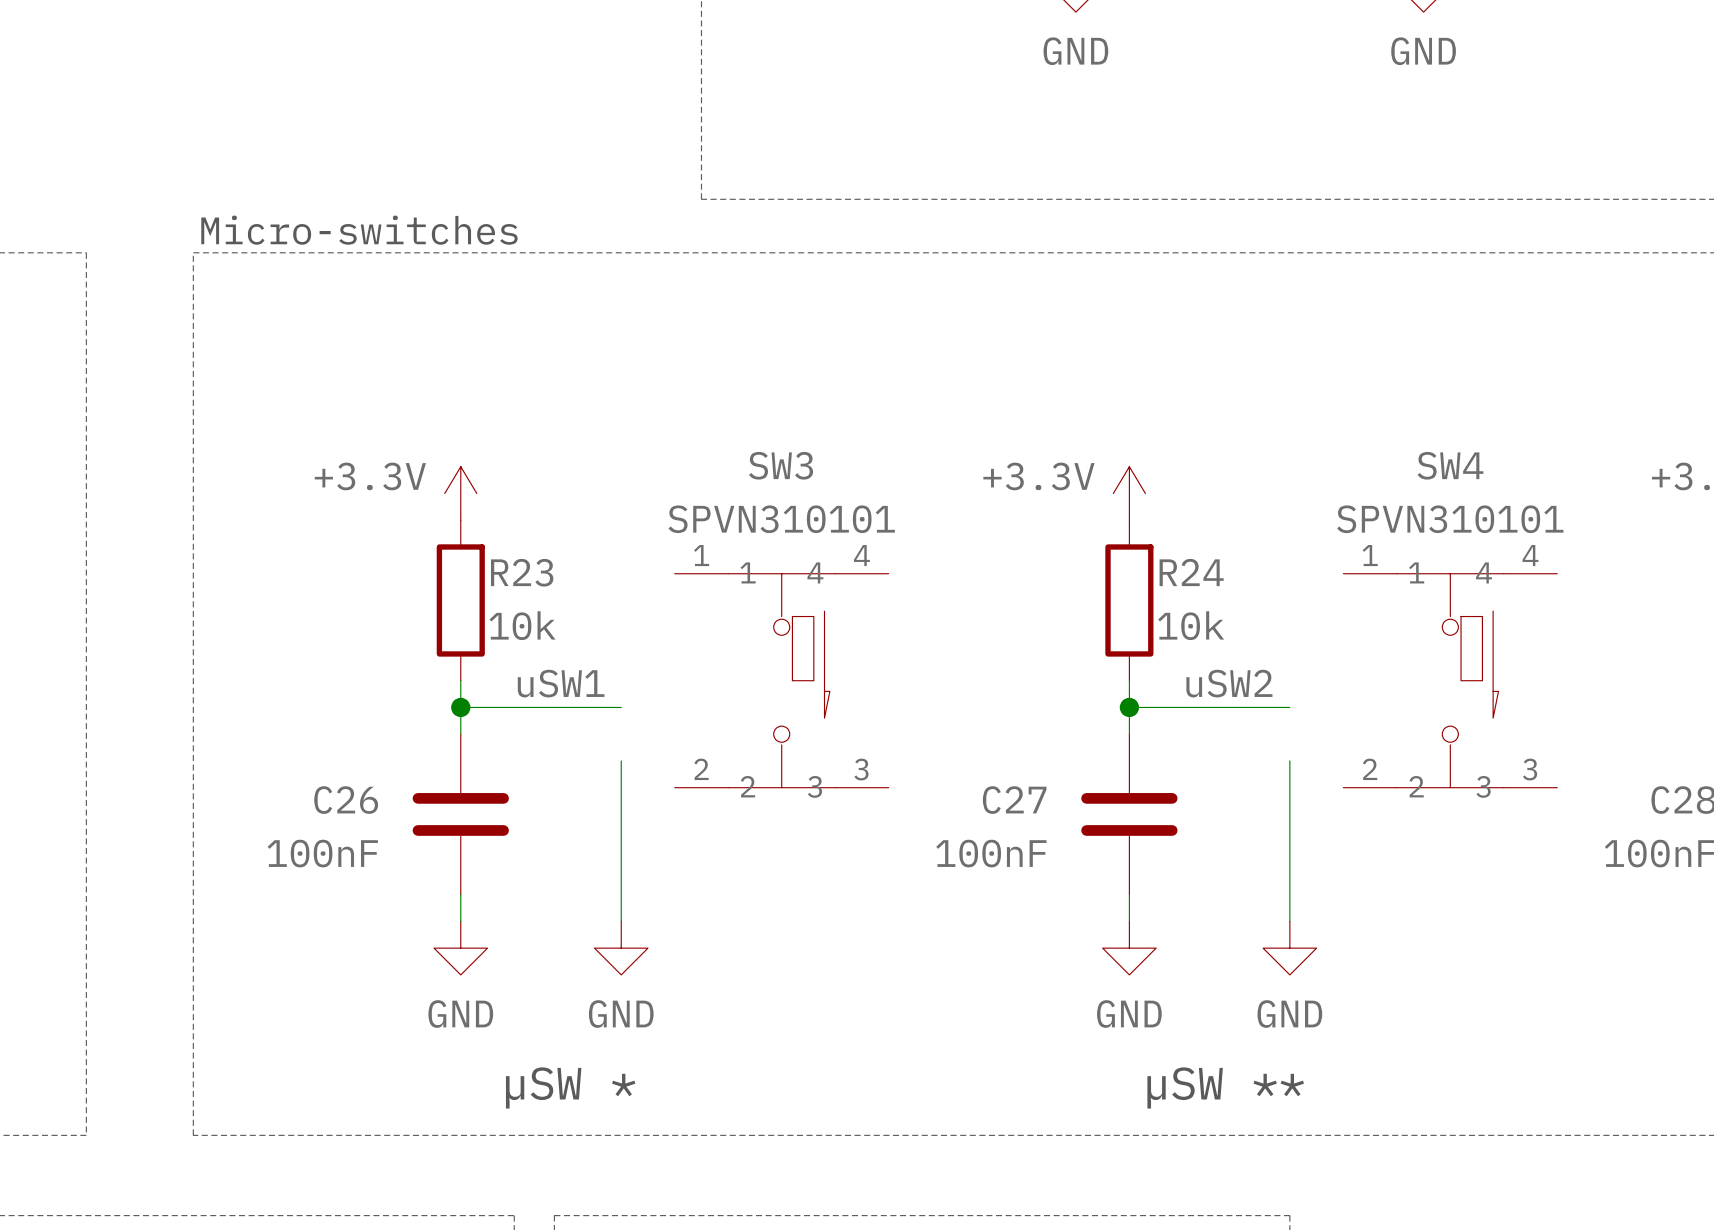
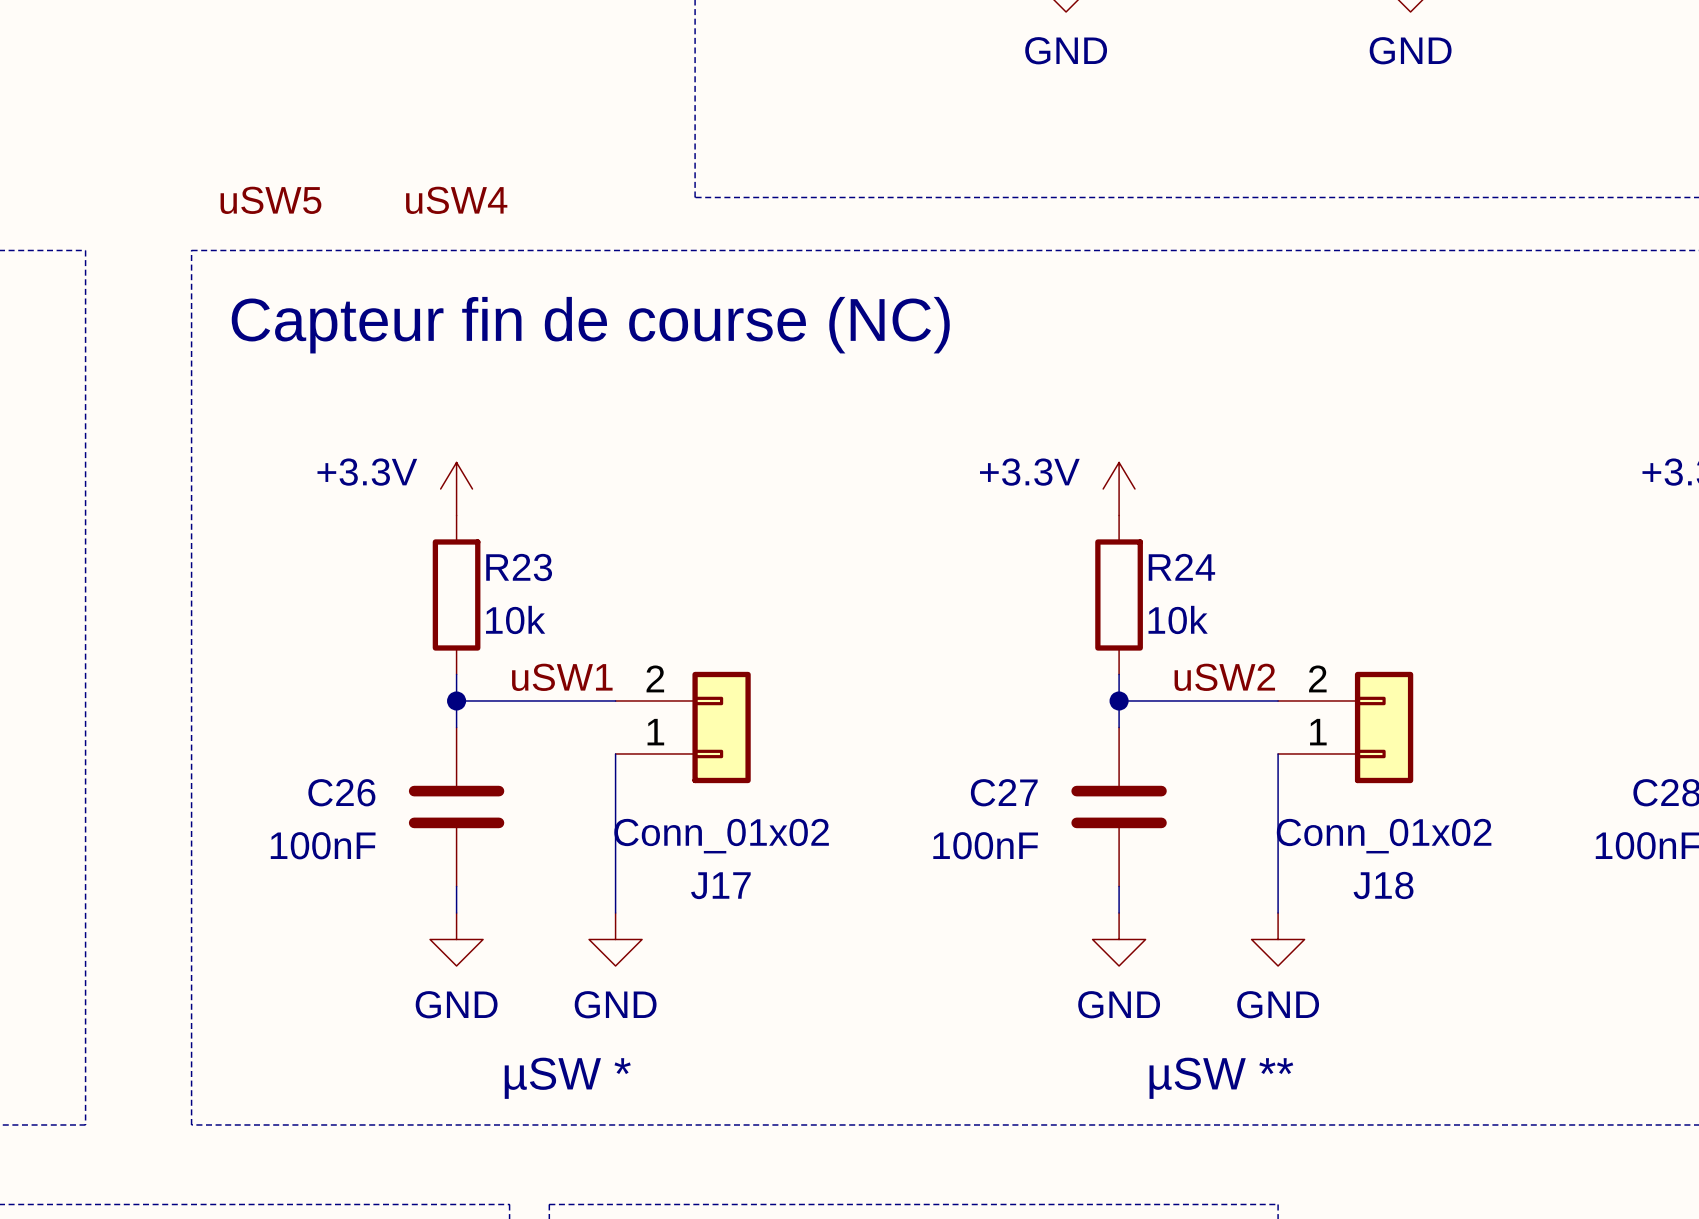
label: none -> uSW5 (270, 200)
label: none -> uSW4 (456, 200)
text: Micro-switches (359, 230) -> none
text: none -> Capteur fin de course (NC) (590, 325)
SW3: SPVN310101 (781, 680) -> none
SW4: SPVN310101 (1450, 680) -> none
J17: none -> Conn_01x02 (683, 727)
J18: none -> Conn_01x02 (1345, 727)

